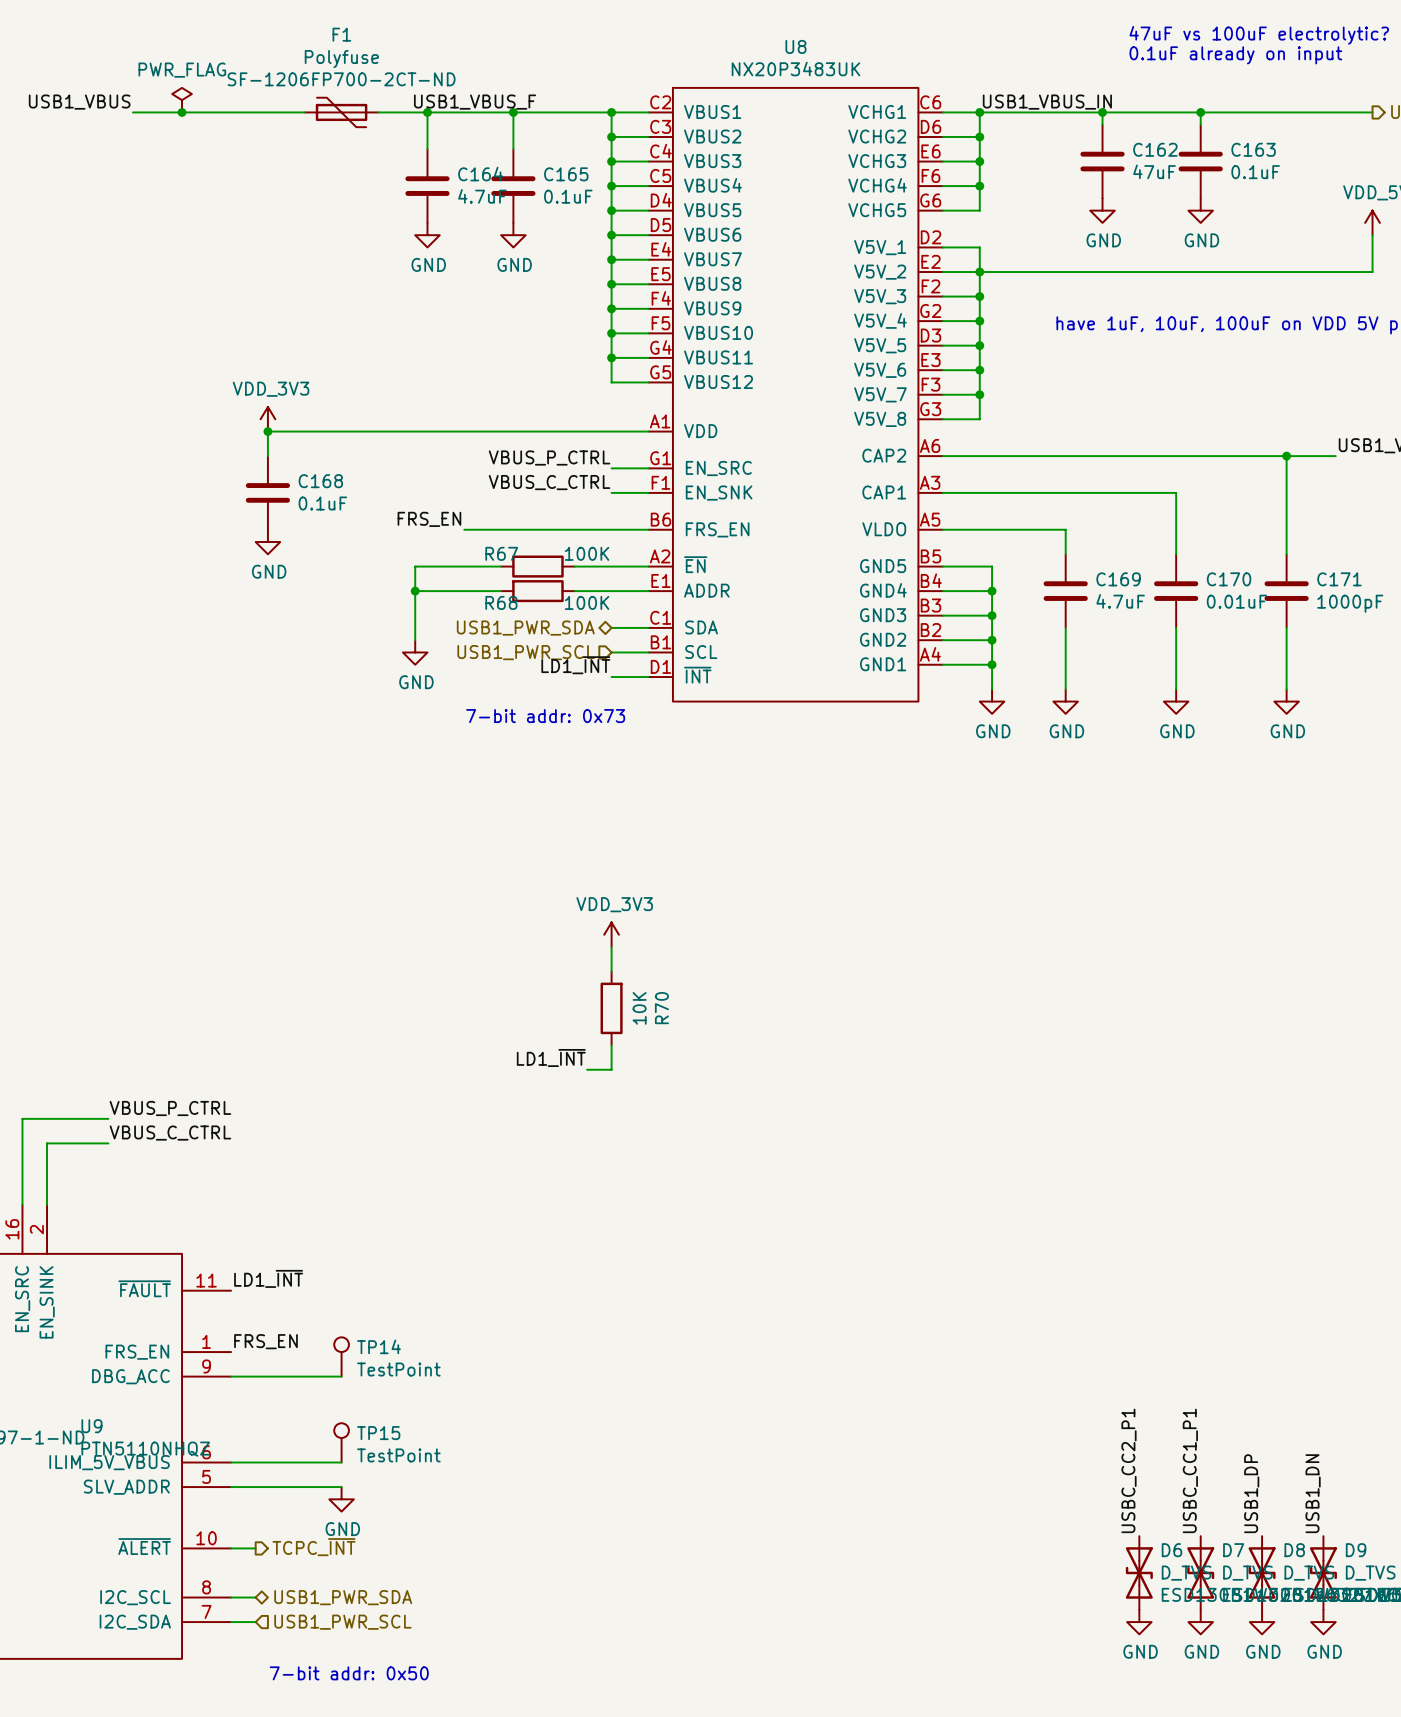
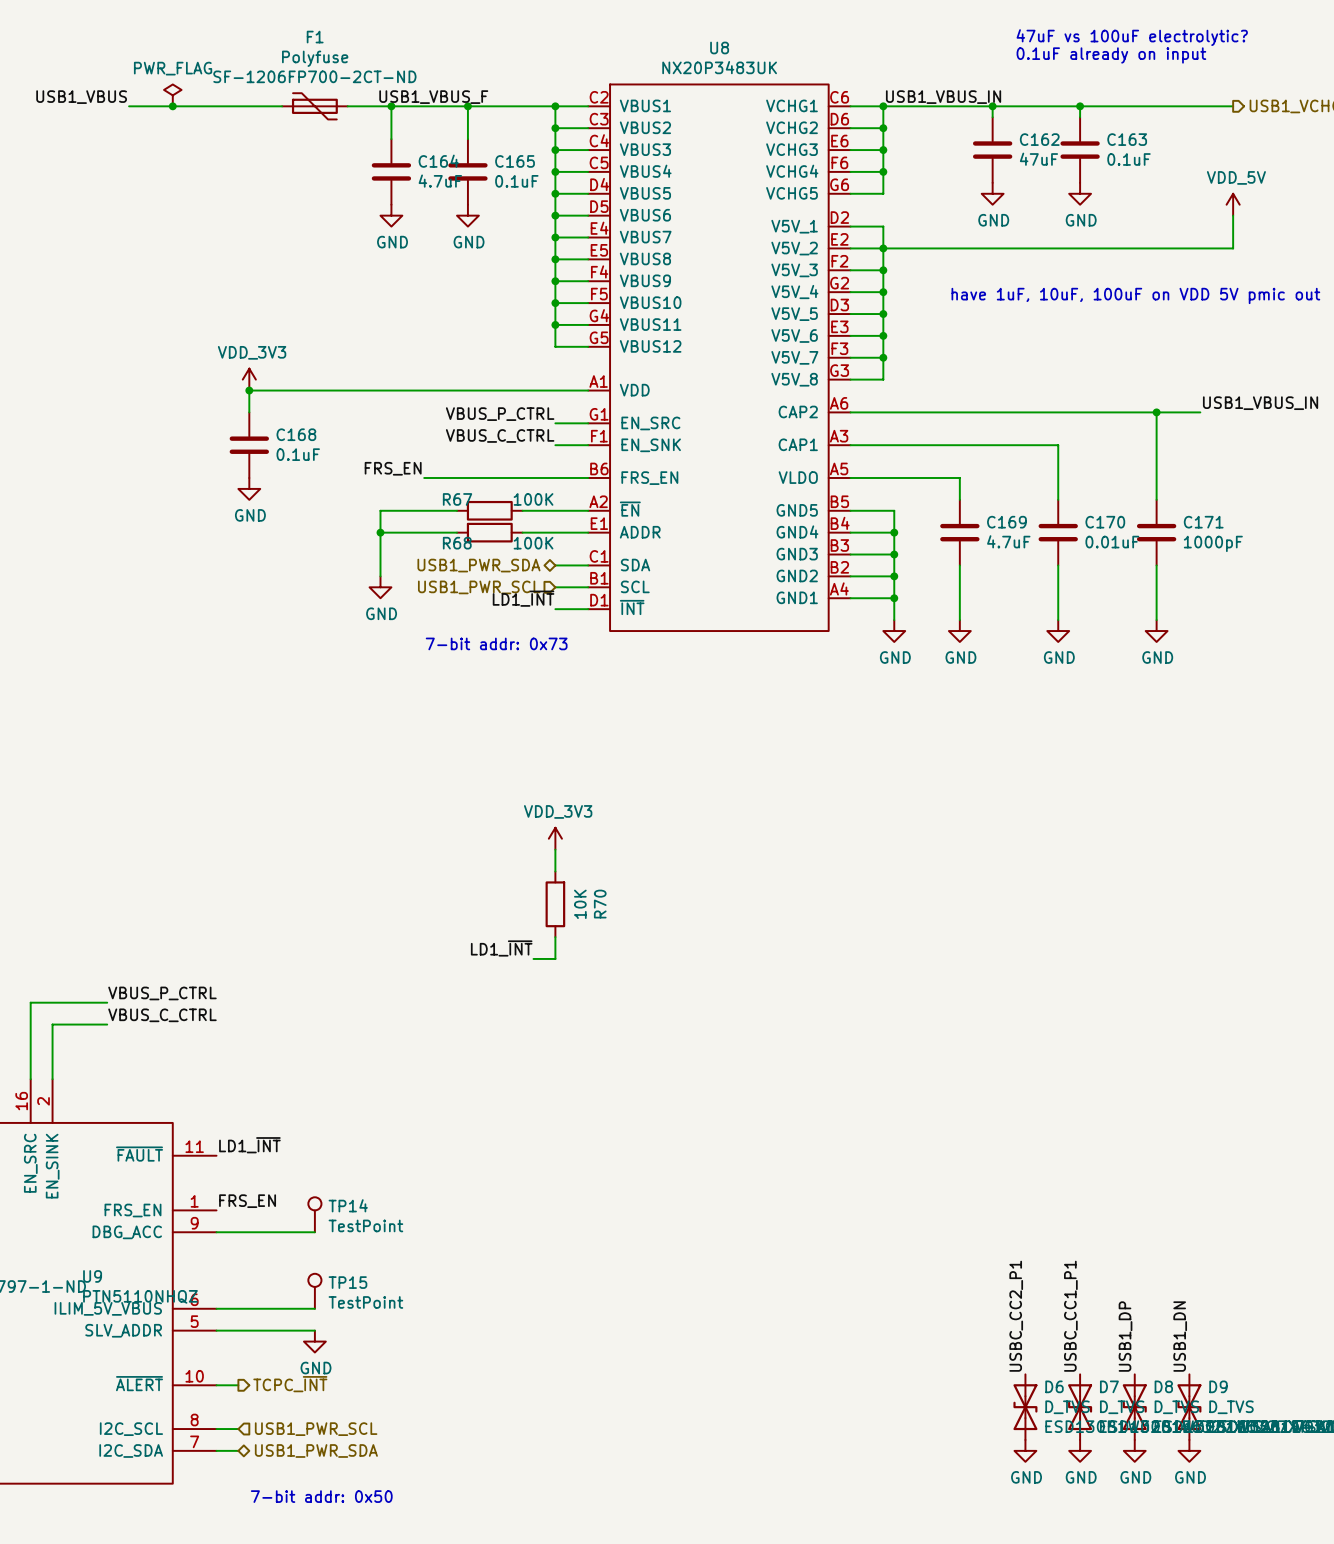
hierarchical label shape: bidirectional (343, 1597) -> input (316, 1429)
hierarchical label: USB1_PWR_SDA (343, 1597) -> USB1_PWR_SCL (316, 1429)
hierarchical label shape: input (342, 1622) -> bidirectional (316, 1450)
hierarchical label: USB1_PWR_SCL (342, 1622) -> USB1_PWR_SDA (316, 1450)

